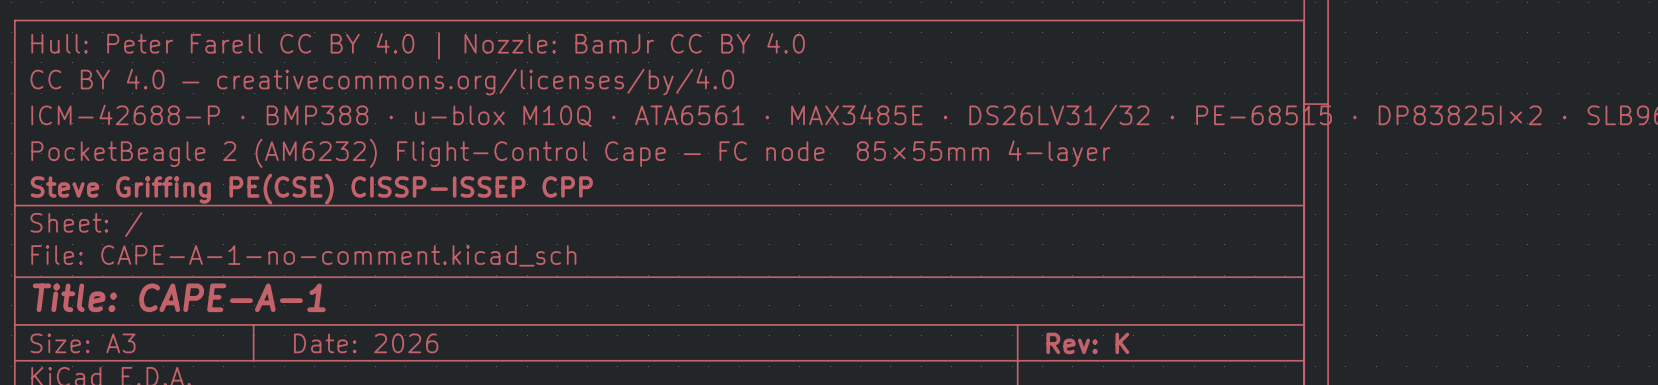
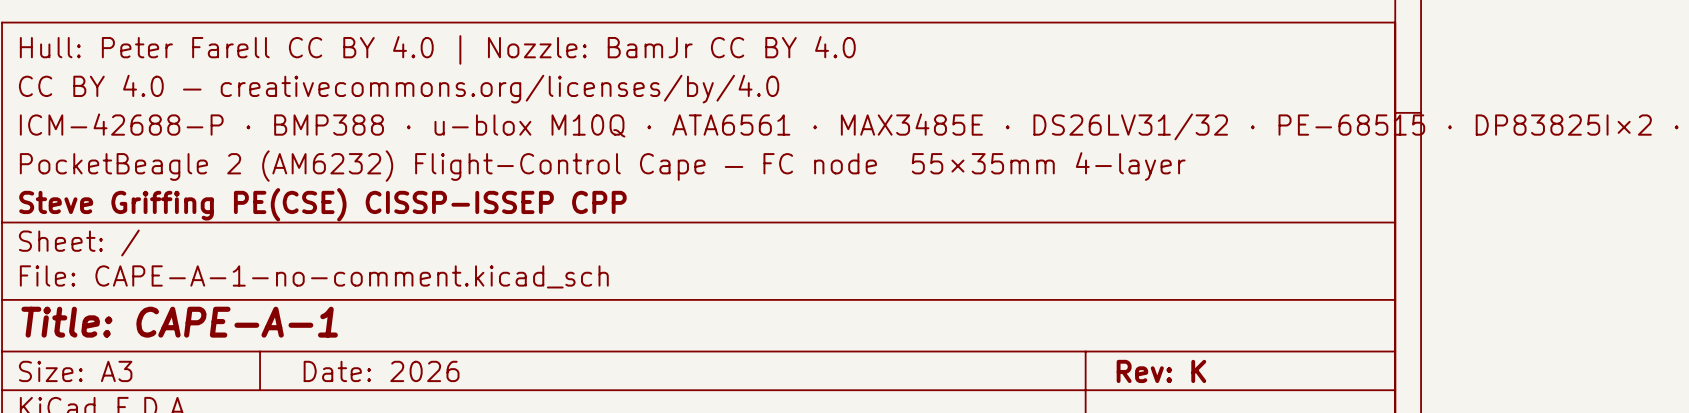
title block: PocketBeagle 2 (AM6232) Flight-Control Cape — FC node 85×55mm 4-layer (570, 153) -> PocketBeagle 2 (AM6232) Flight-Control Cape — FC node 55×35mm 4-layer (602, 166)

